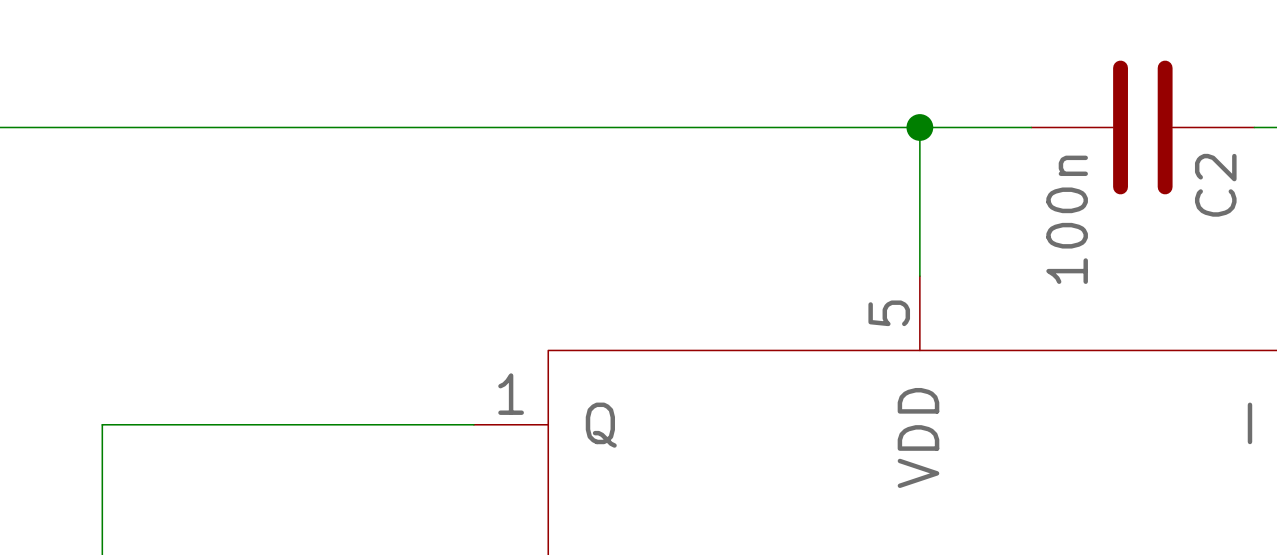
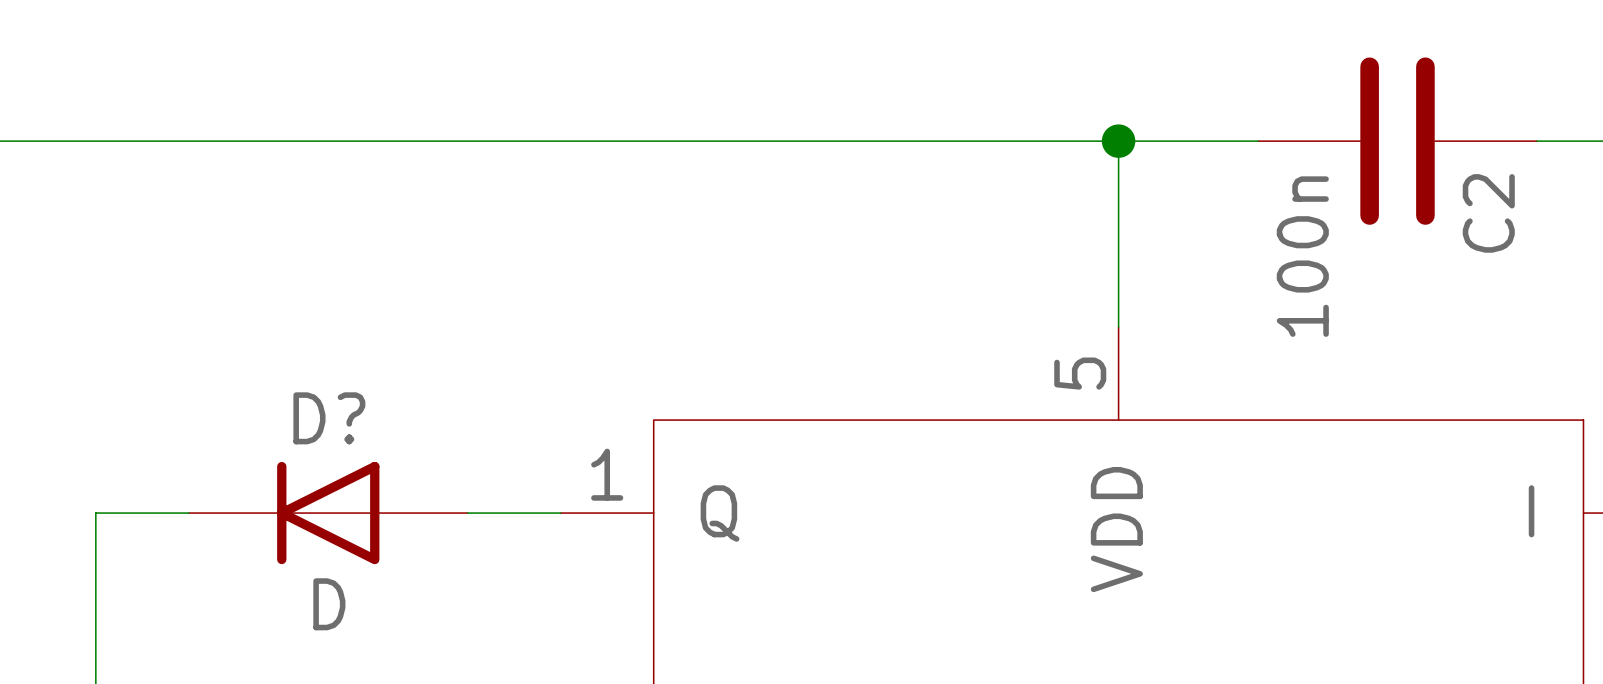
D?: none -> D (328, 513)

